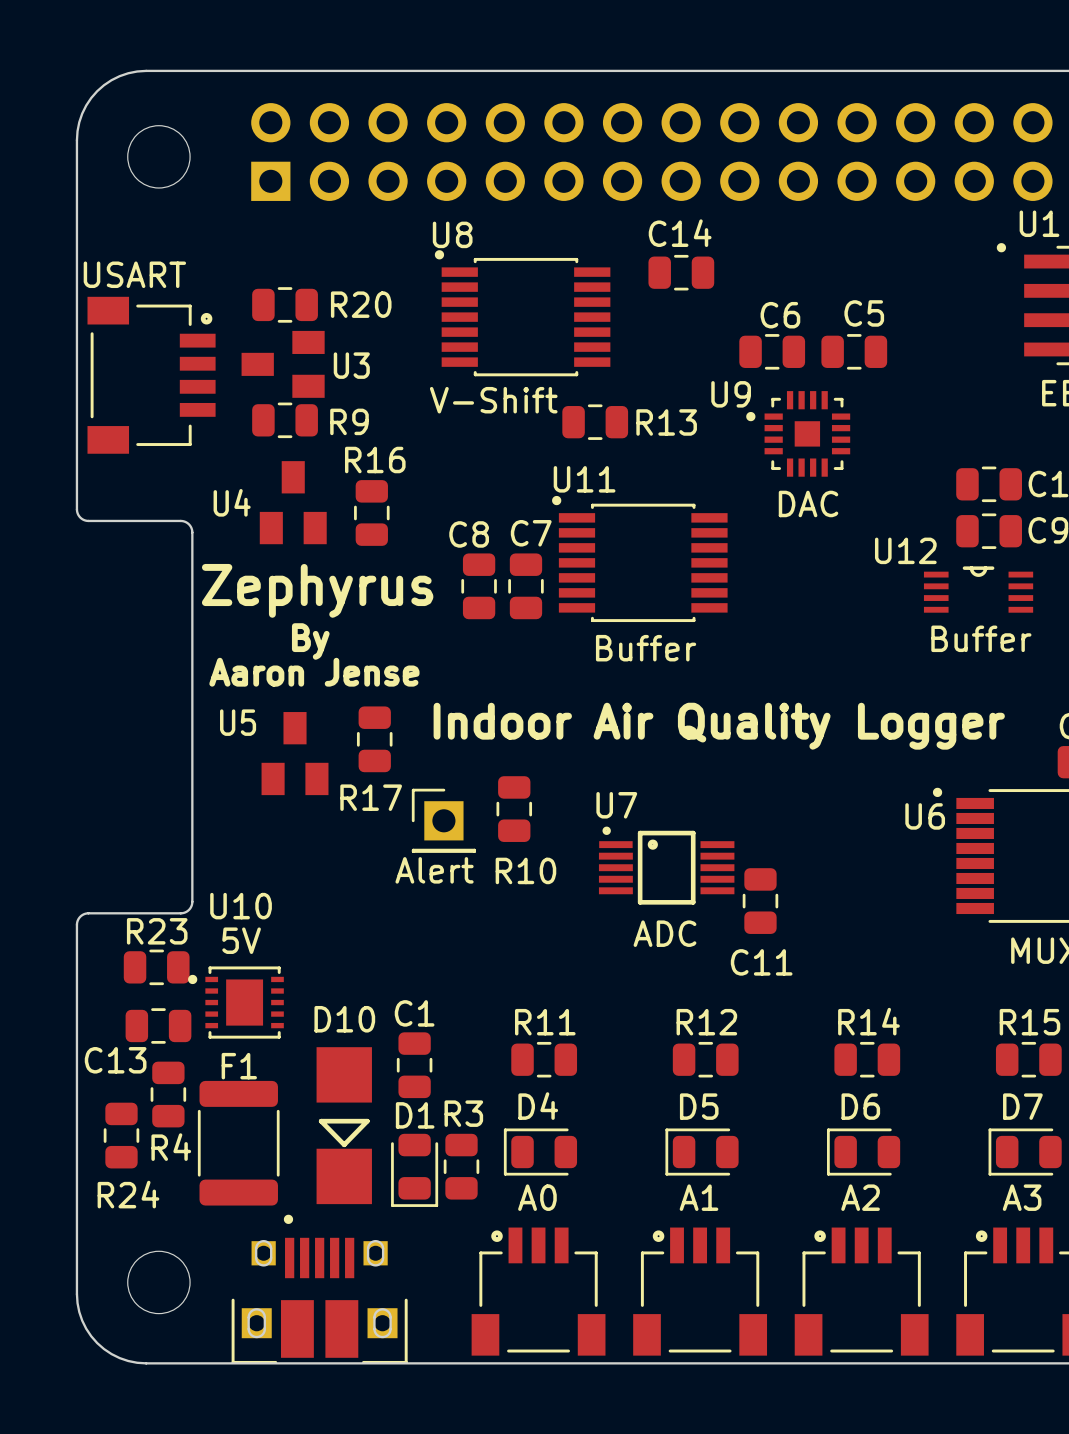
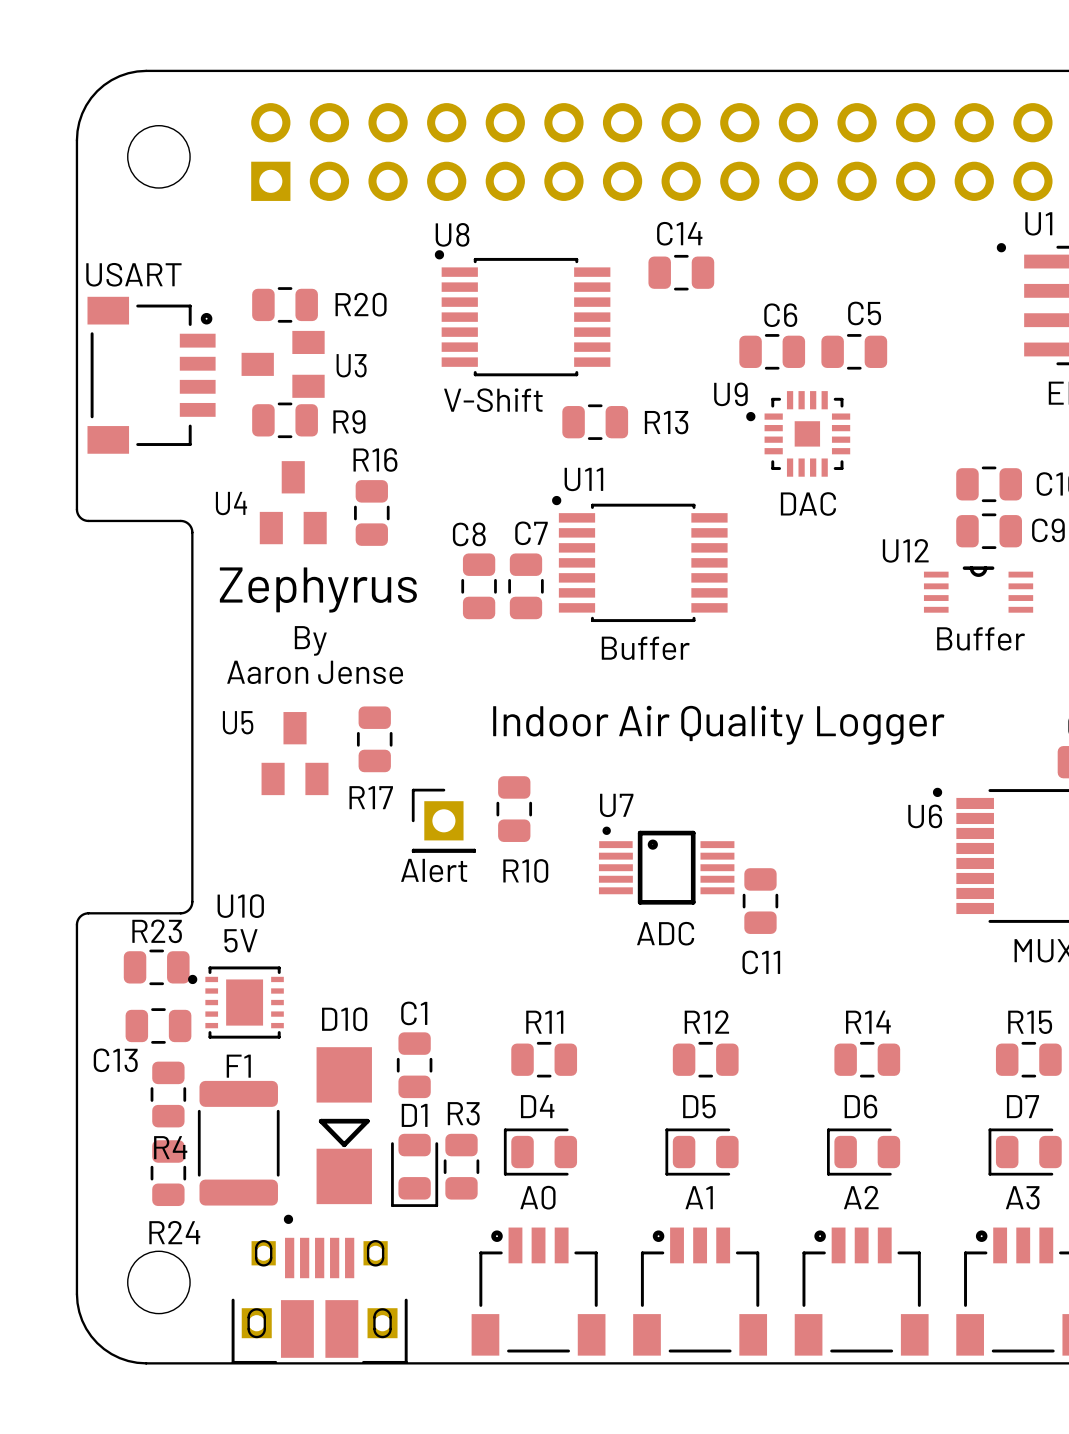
R24 position: (121, 1135) -> (168, 1173)

